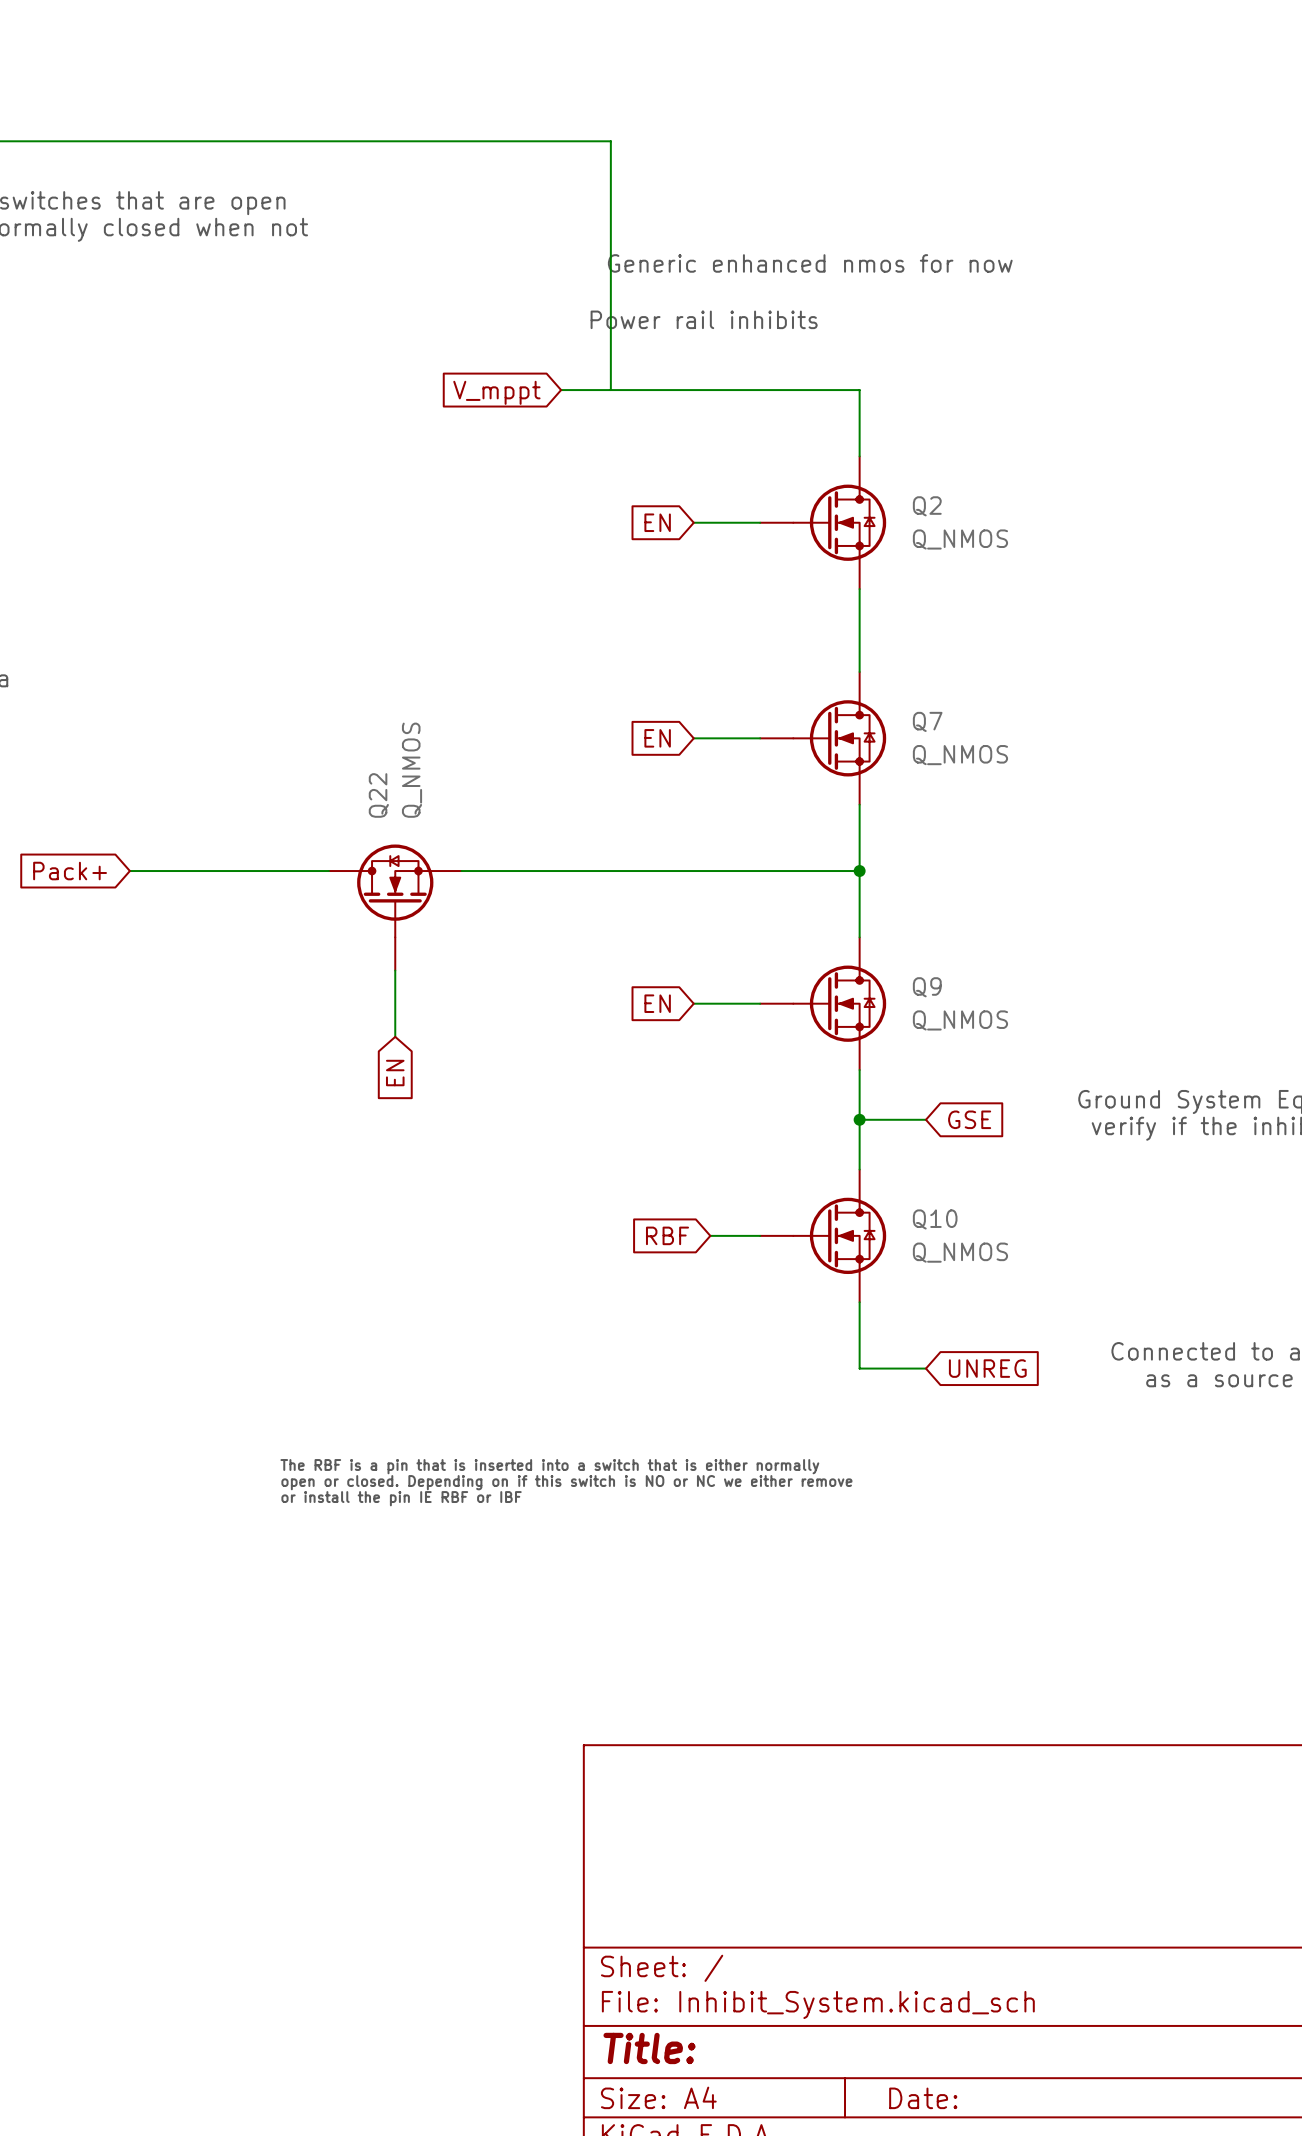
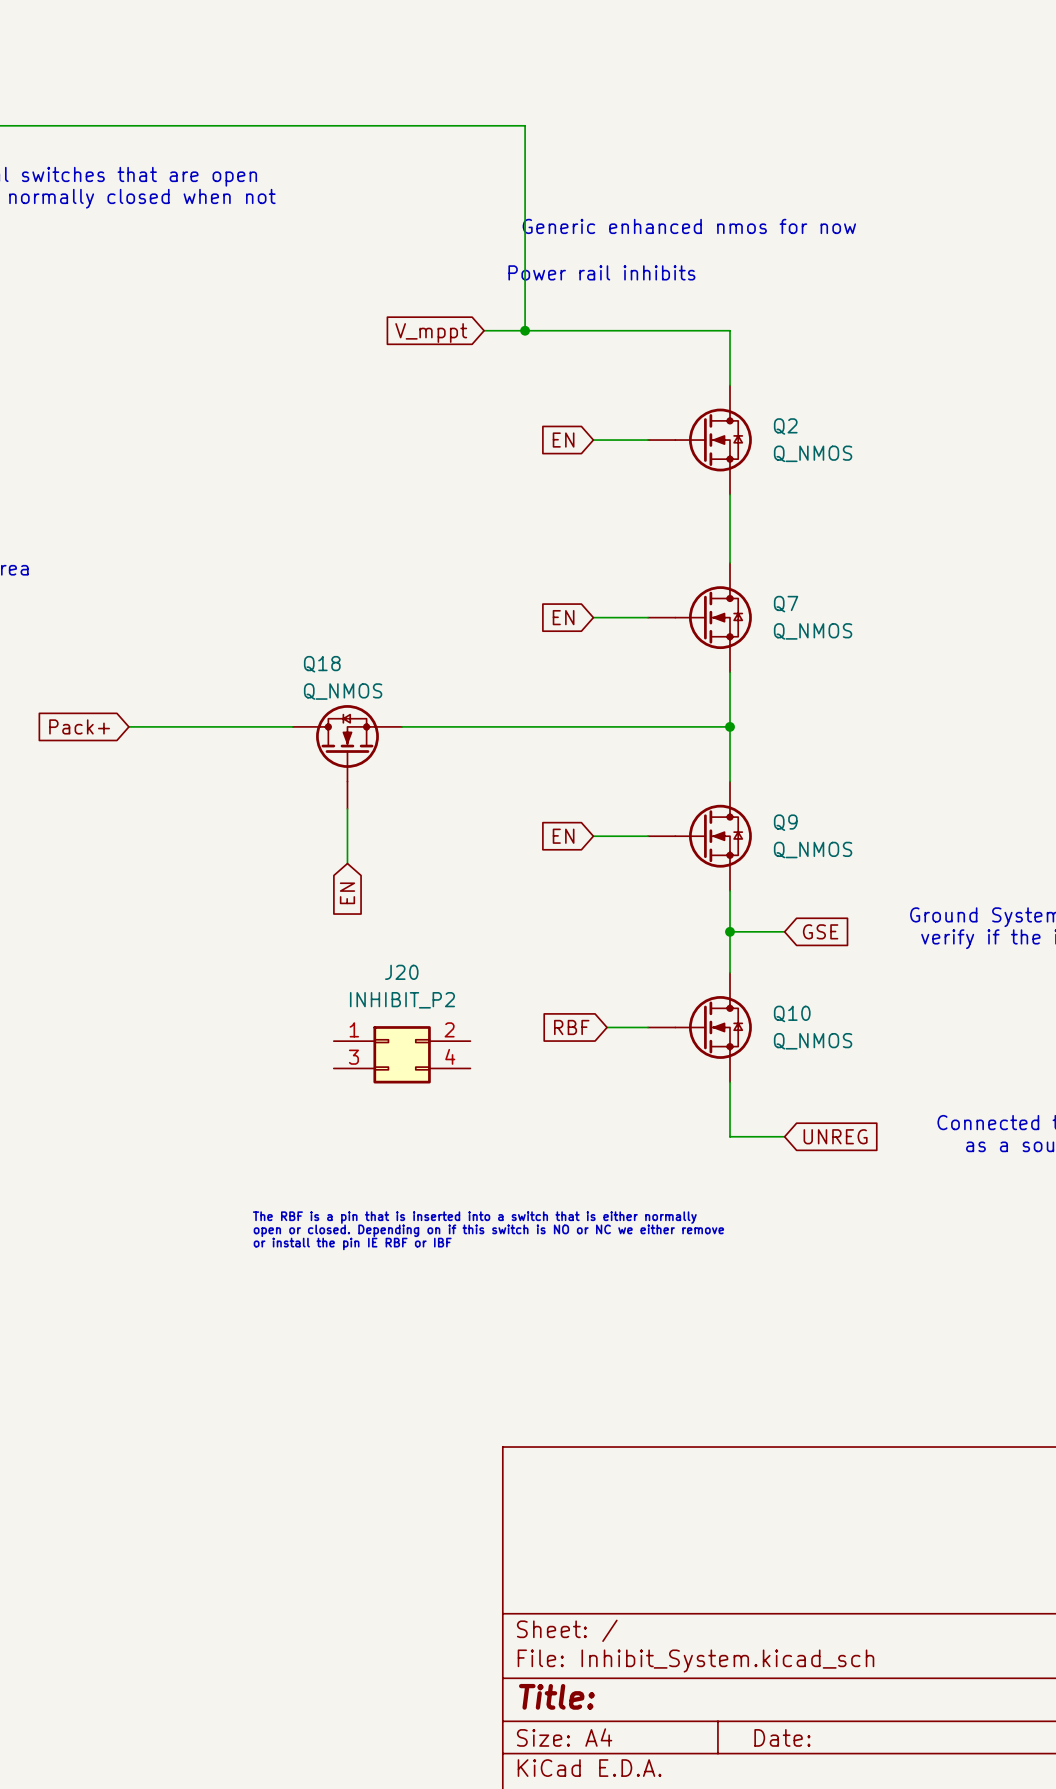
junction: none -> (525, 330)
Q22 value rotation: 0° (412, 770) -> 90° clockwise (343, 691)
Q22 name: Q22 (378, 795) -> Q18 (322, 664)
J20: none -> INHIBIT_P2 (402, 1054)

